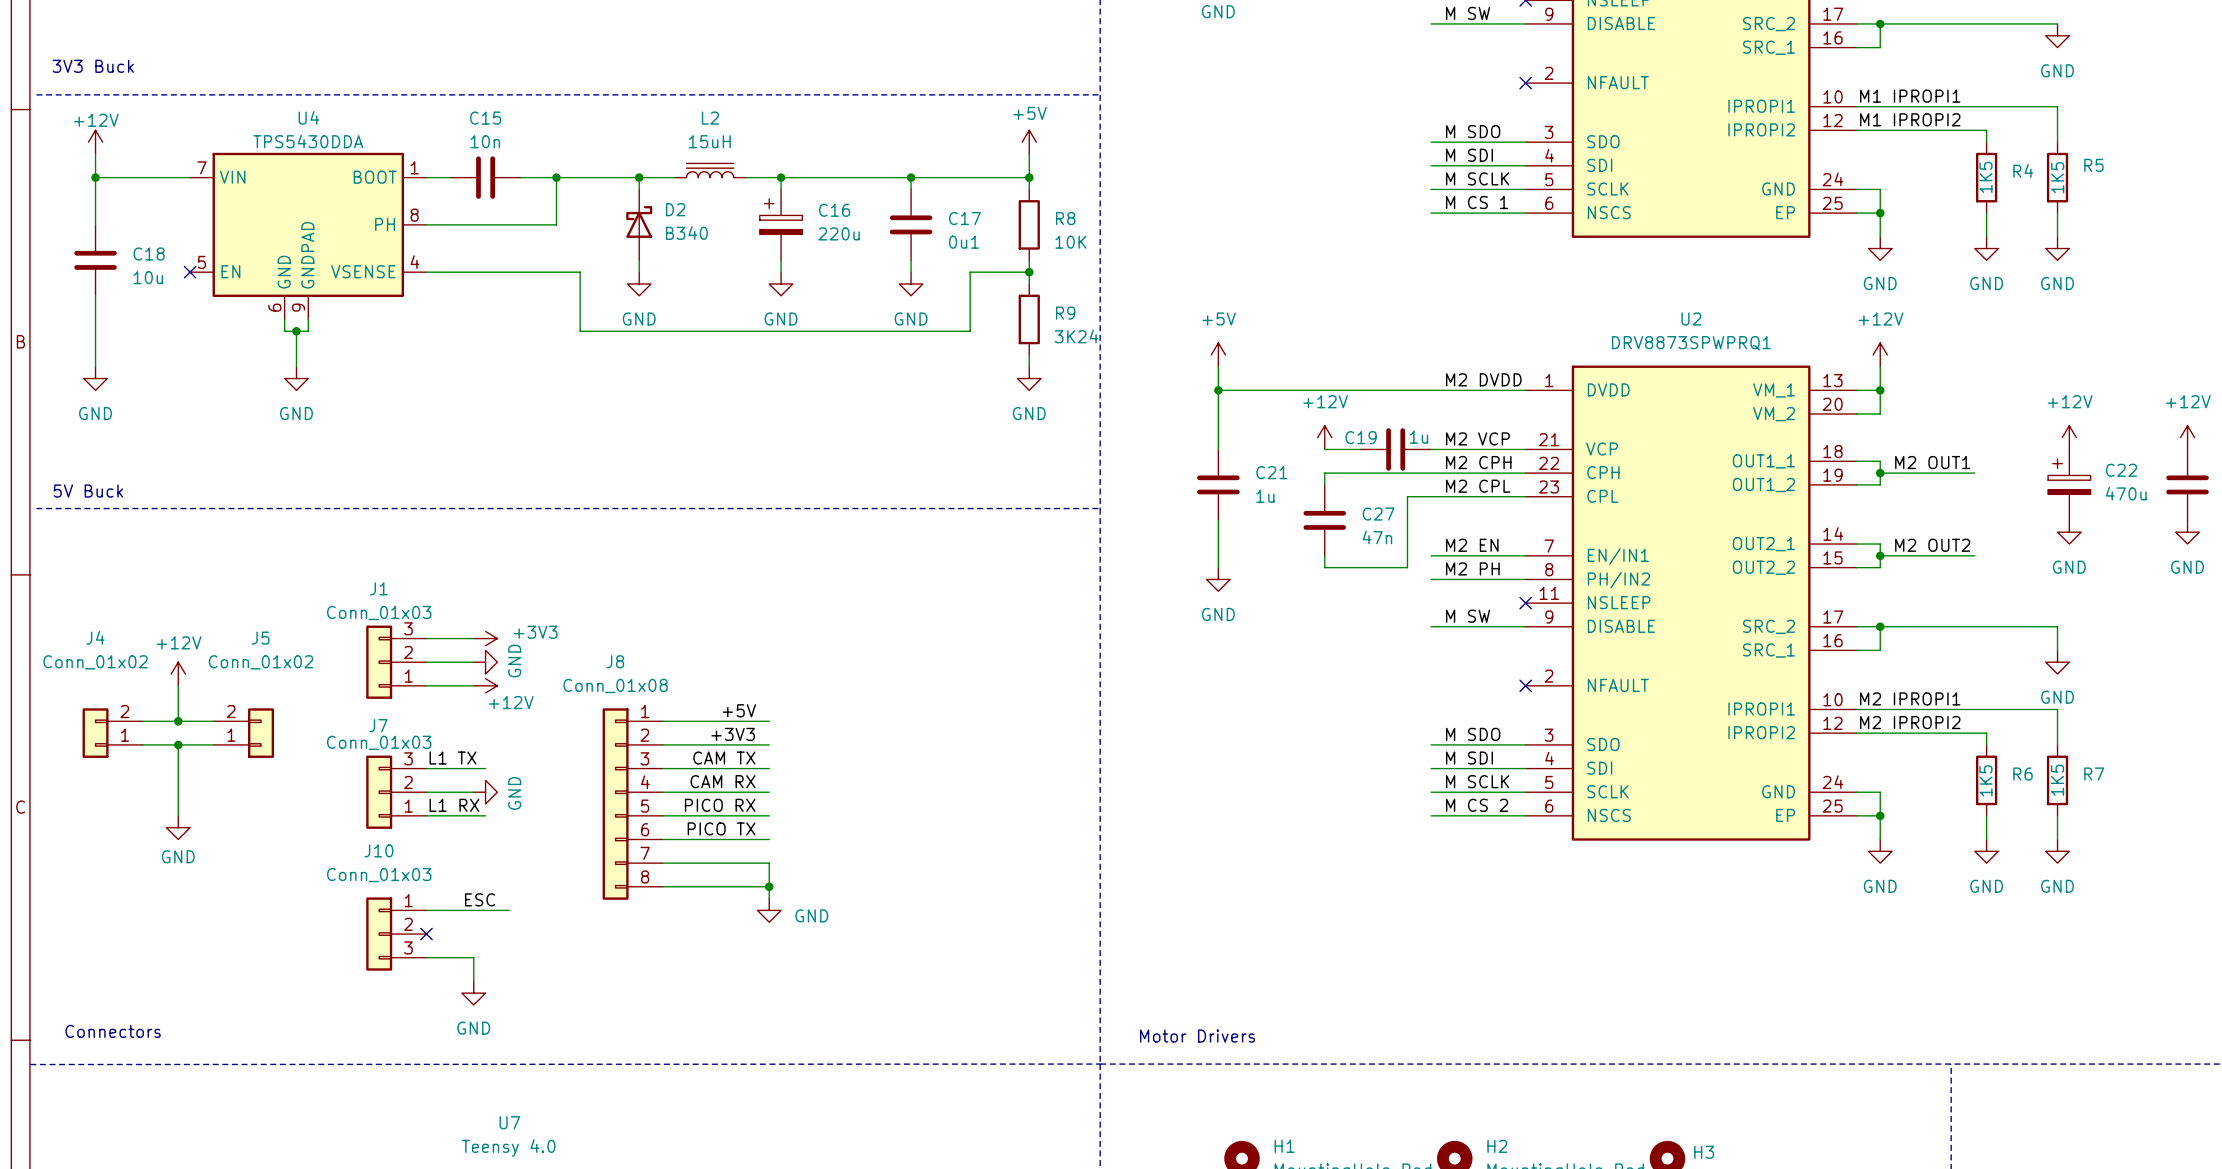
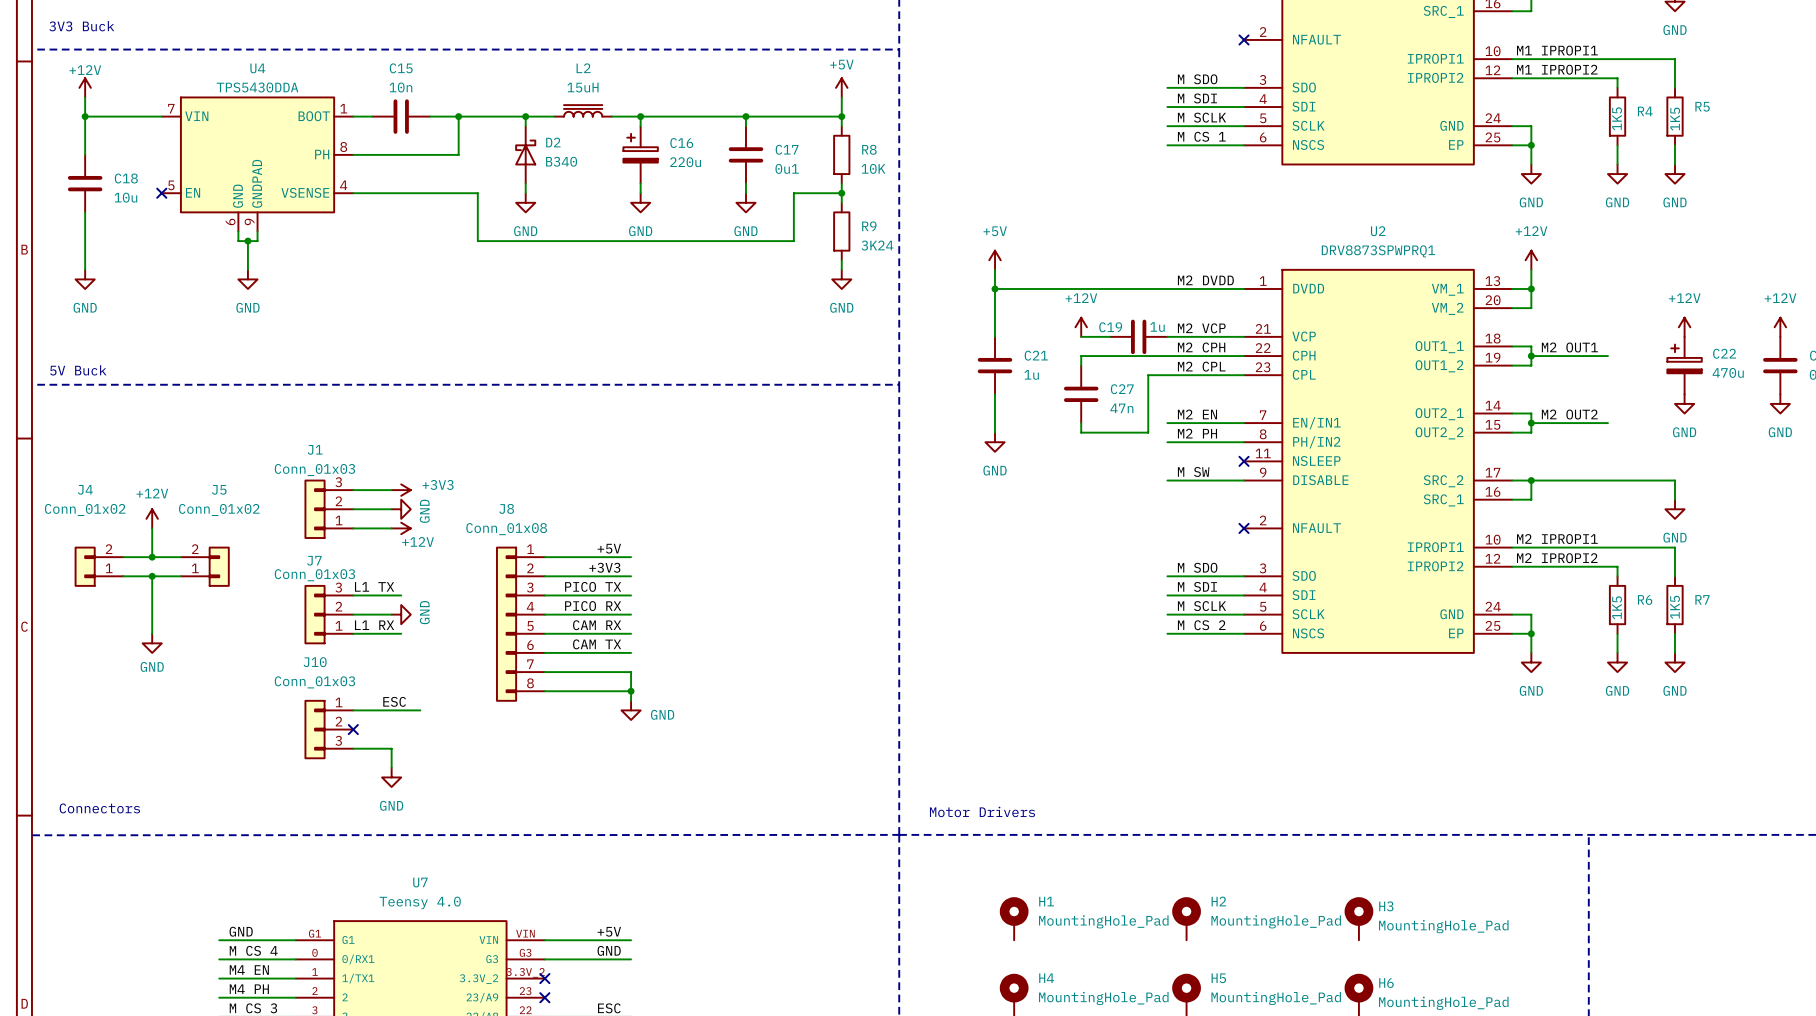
label: CAM TX (724, 758) -> PICO TX (593, 586)
label: CAM RX (723, 781) -> PICO RX (593, 606)
label: PICO RX (720, 805) -> CAM RX (597, 625)
label: PICO TX (721, 828) -> CAM TX (597, 644)

